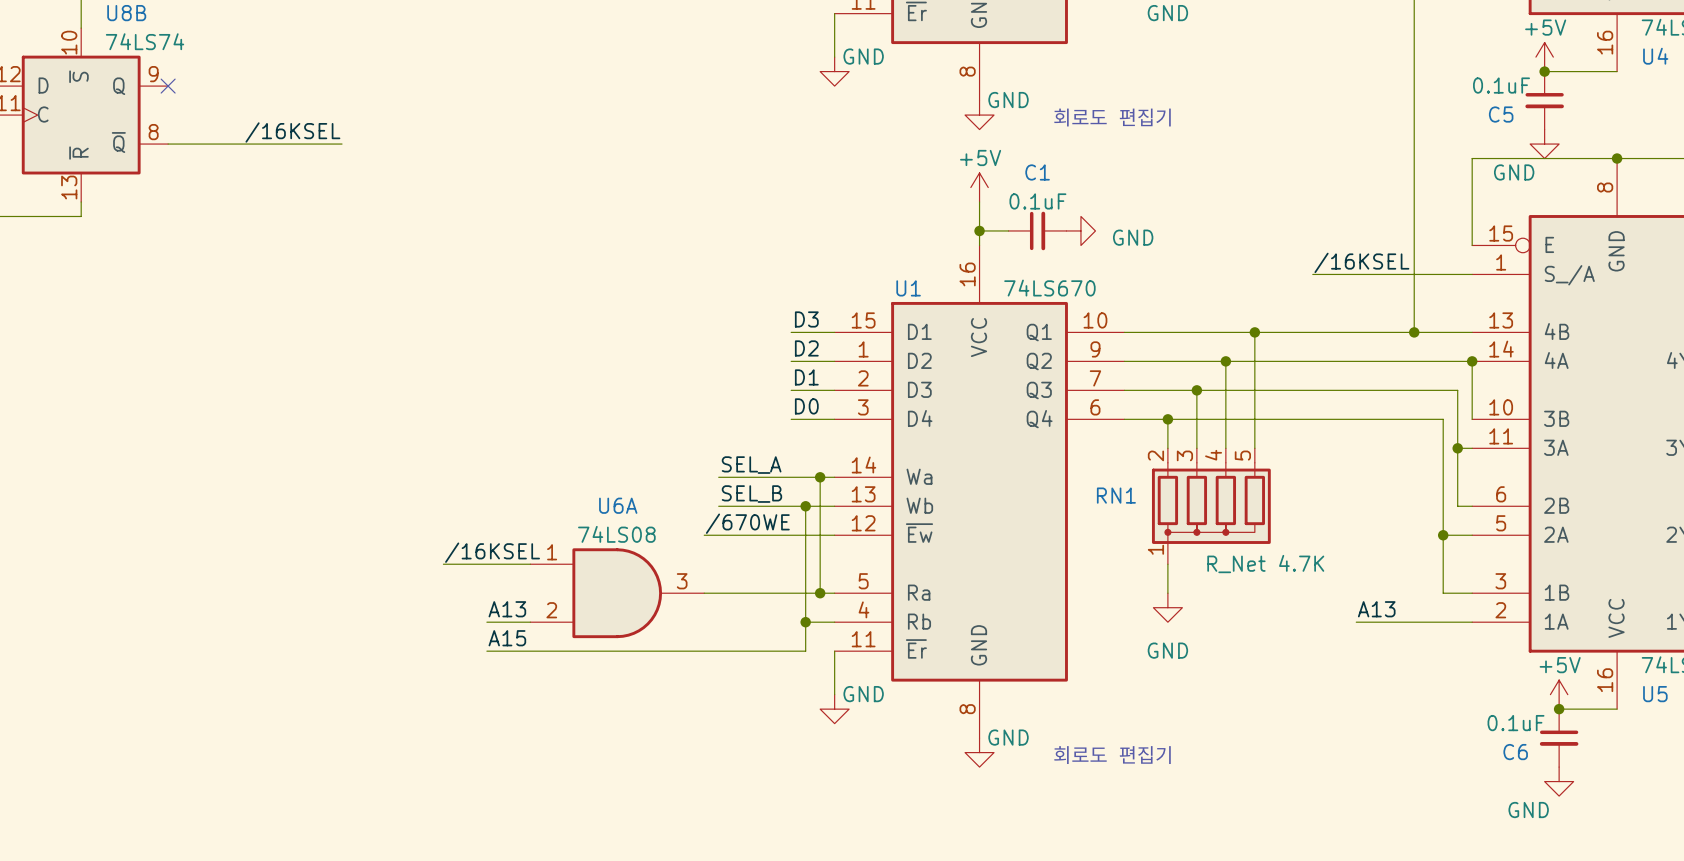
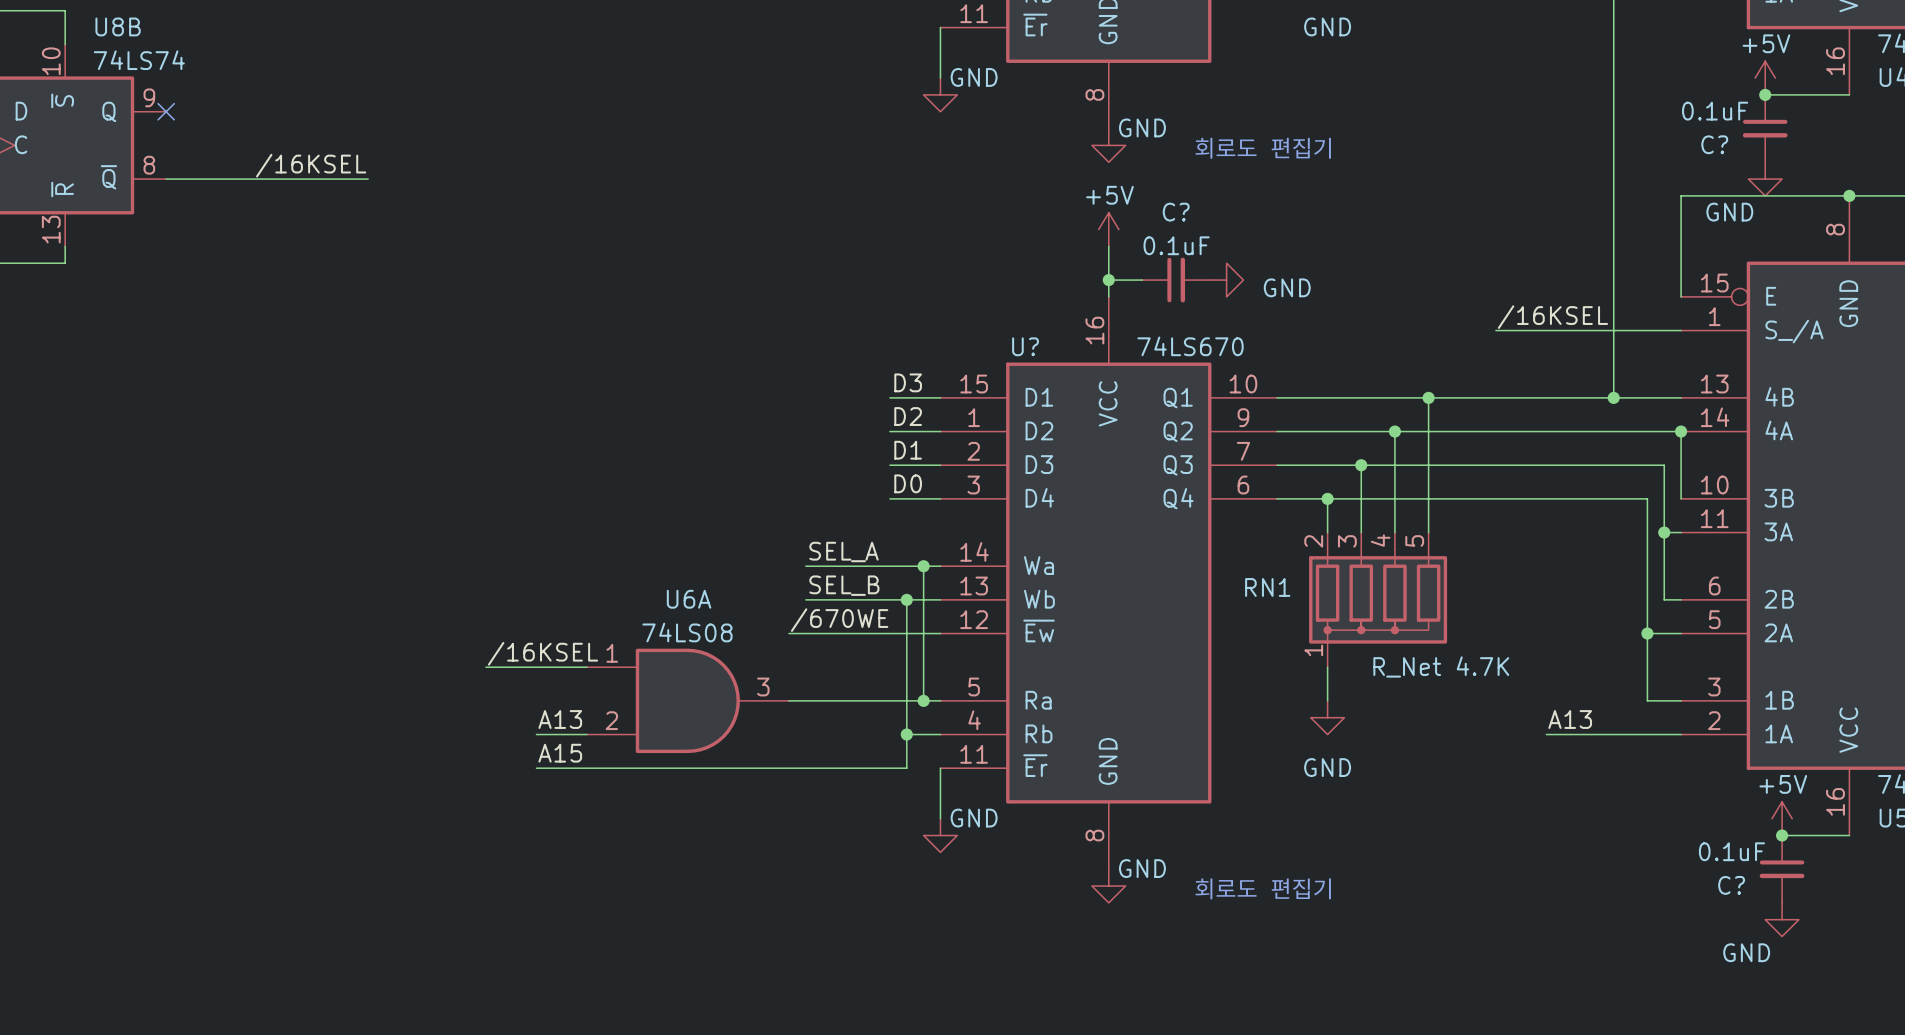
C5 name: C5 (1501, 114) -> C? (1714, 144)
C1 name: C1 (1037, 172) -> C? (1176, 212)
U1 name: U1 (908, 288) -> U? (1025, 346)
C6 name: C6 (1515, 752) -> C? (1731, 885)

